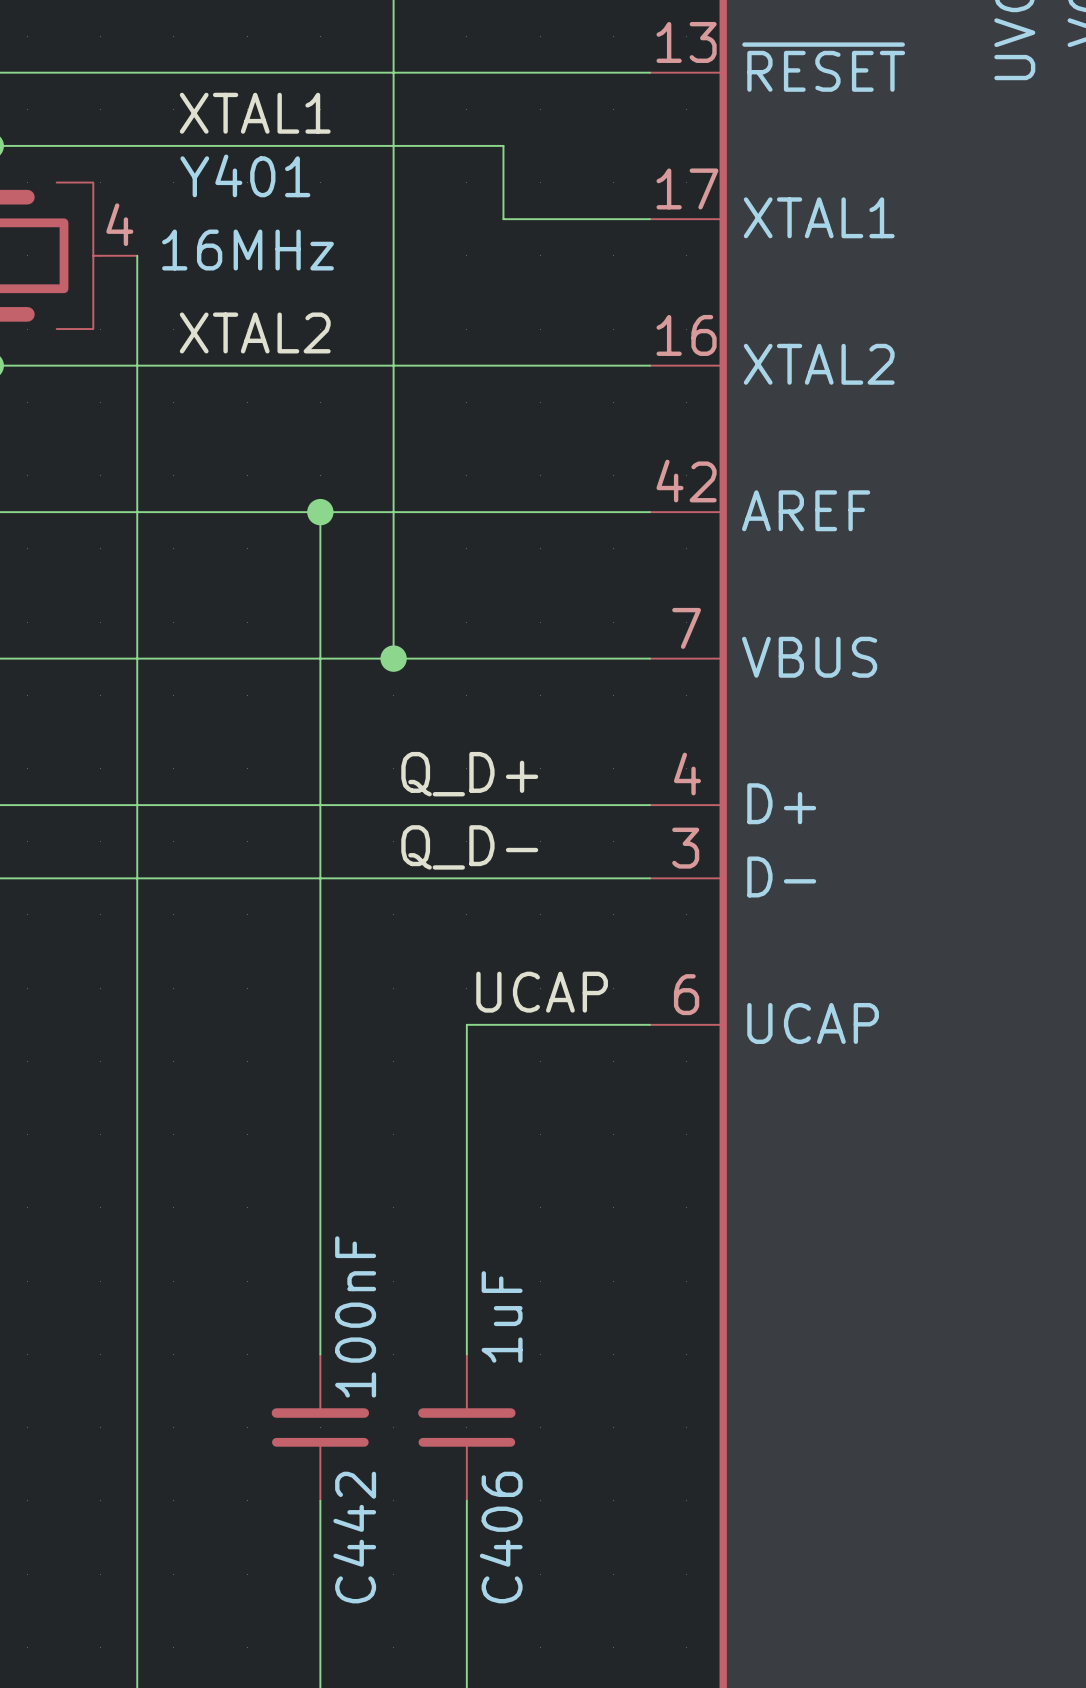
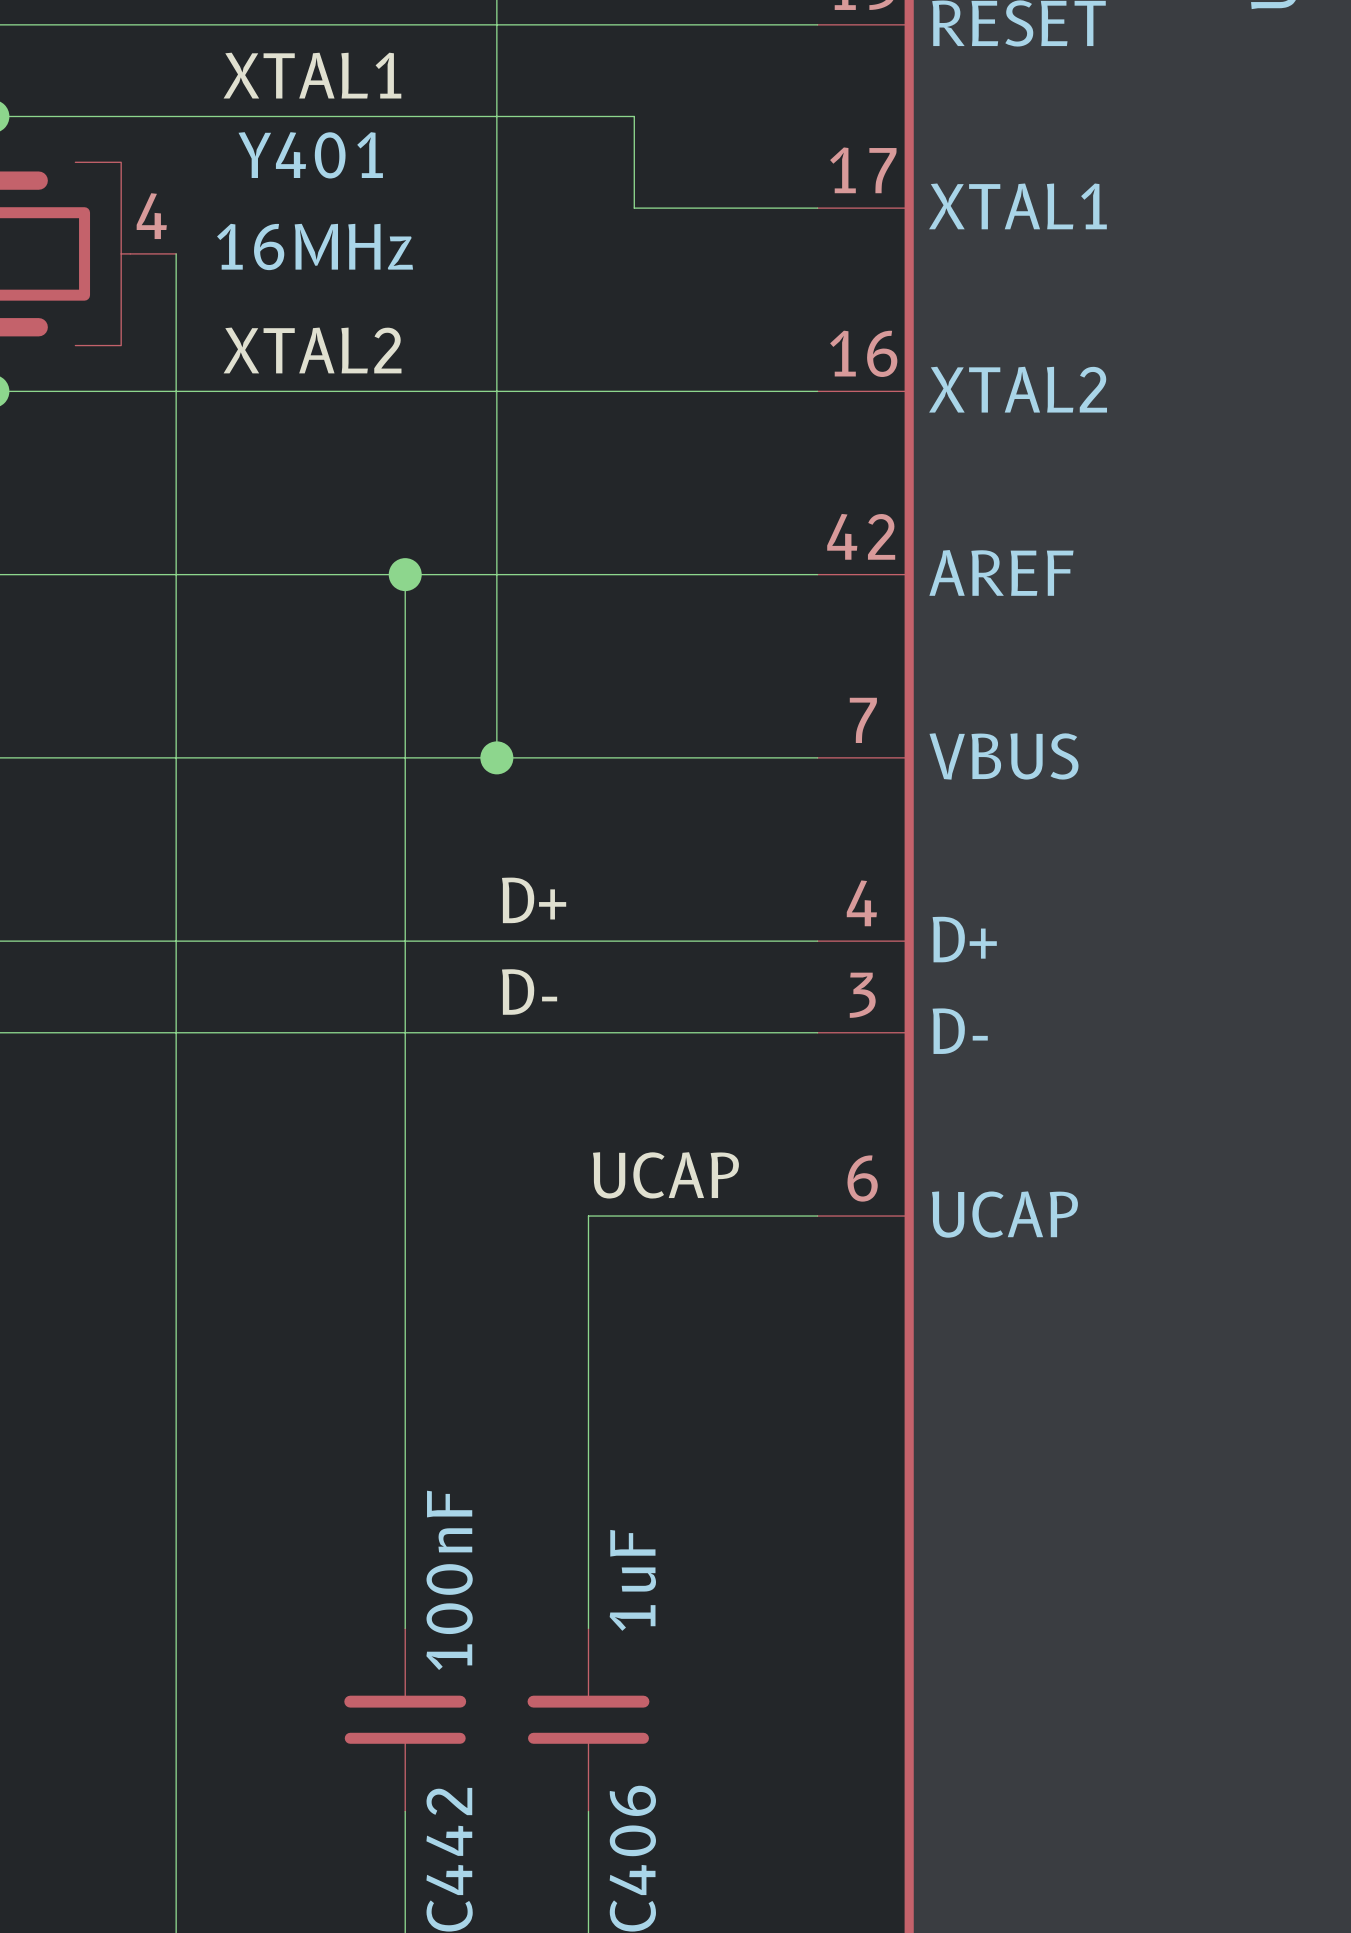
label: Q_D+ (469, 774) -> D+ (534, 900)
label: Q_D- (469, 847) -> D- (529, 992)

